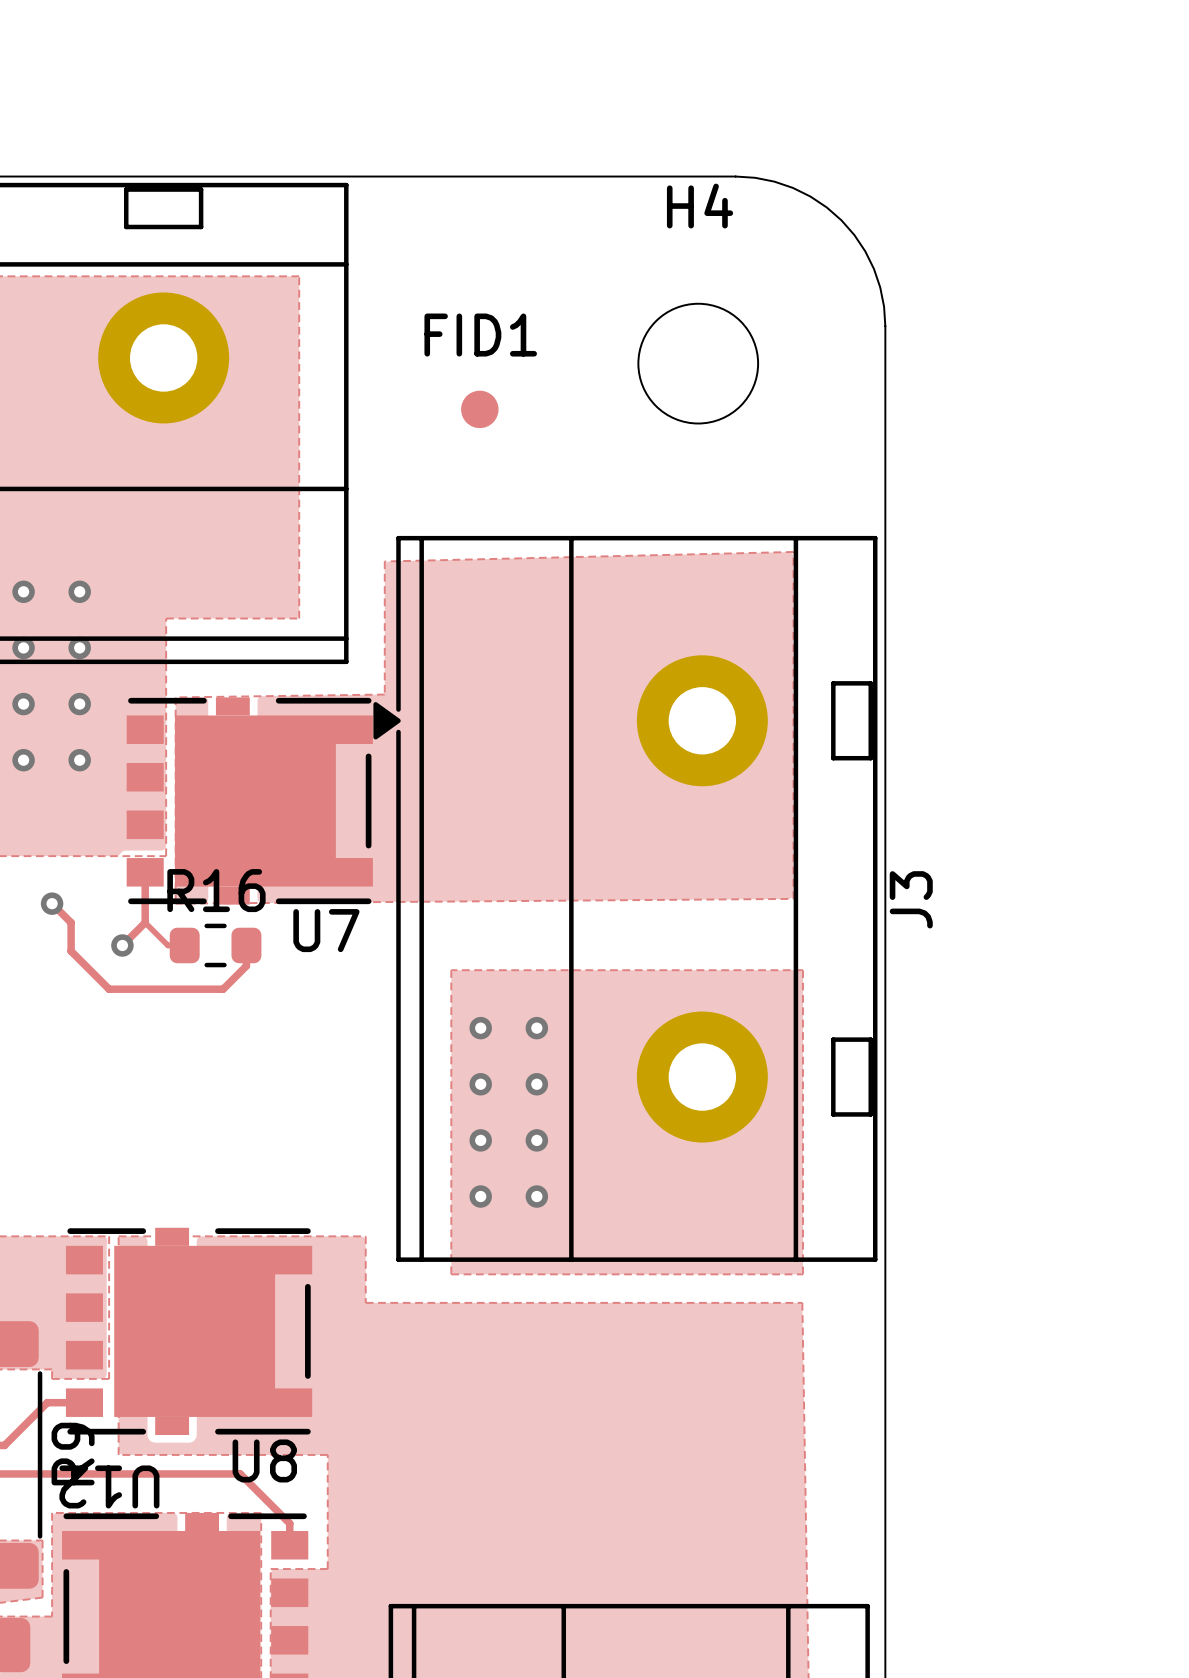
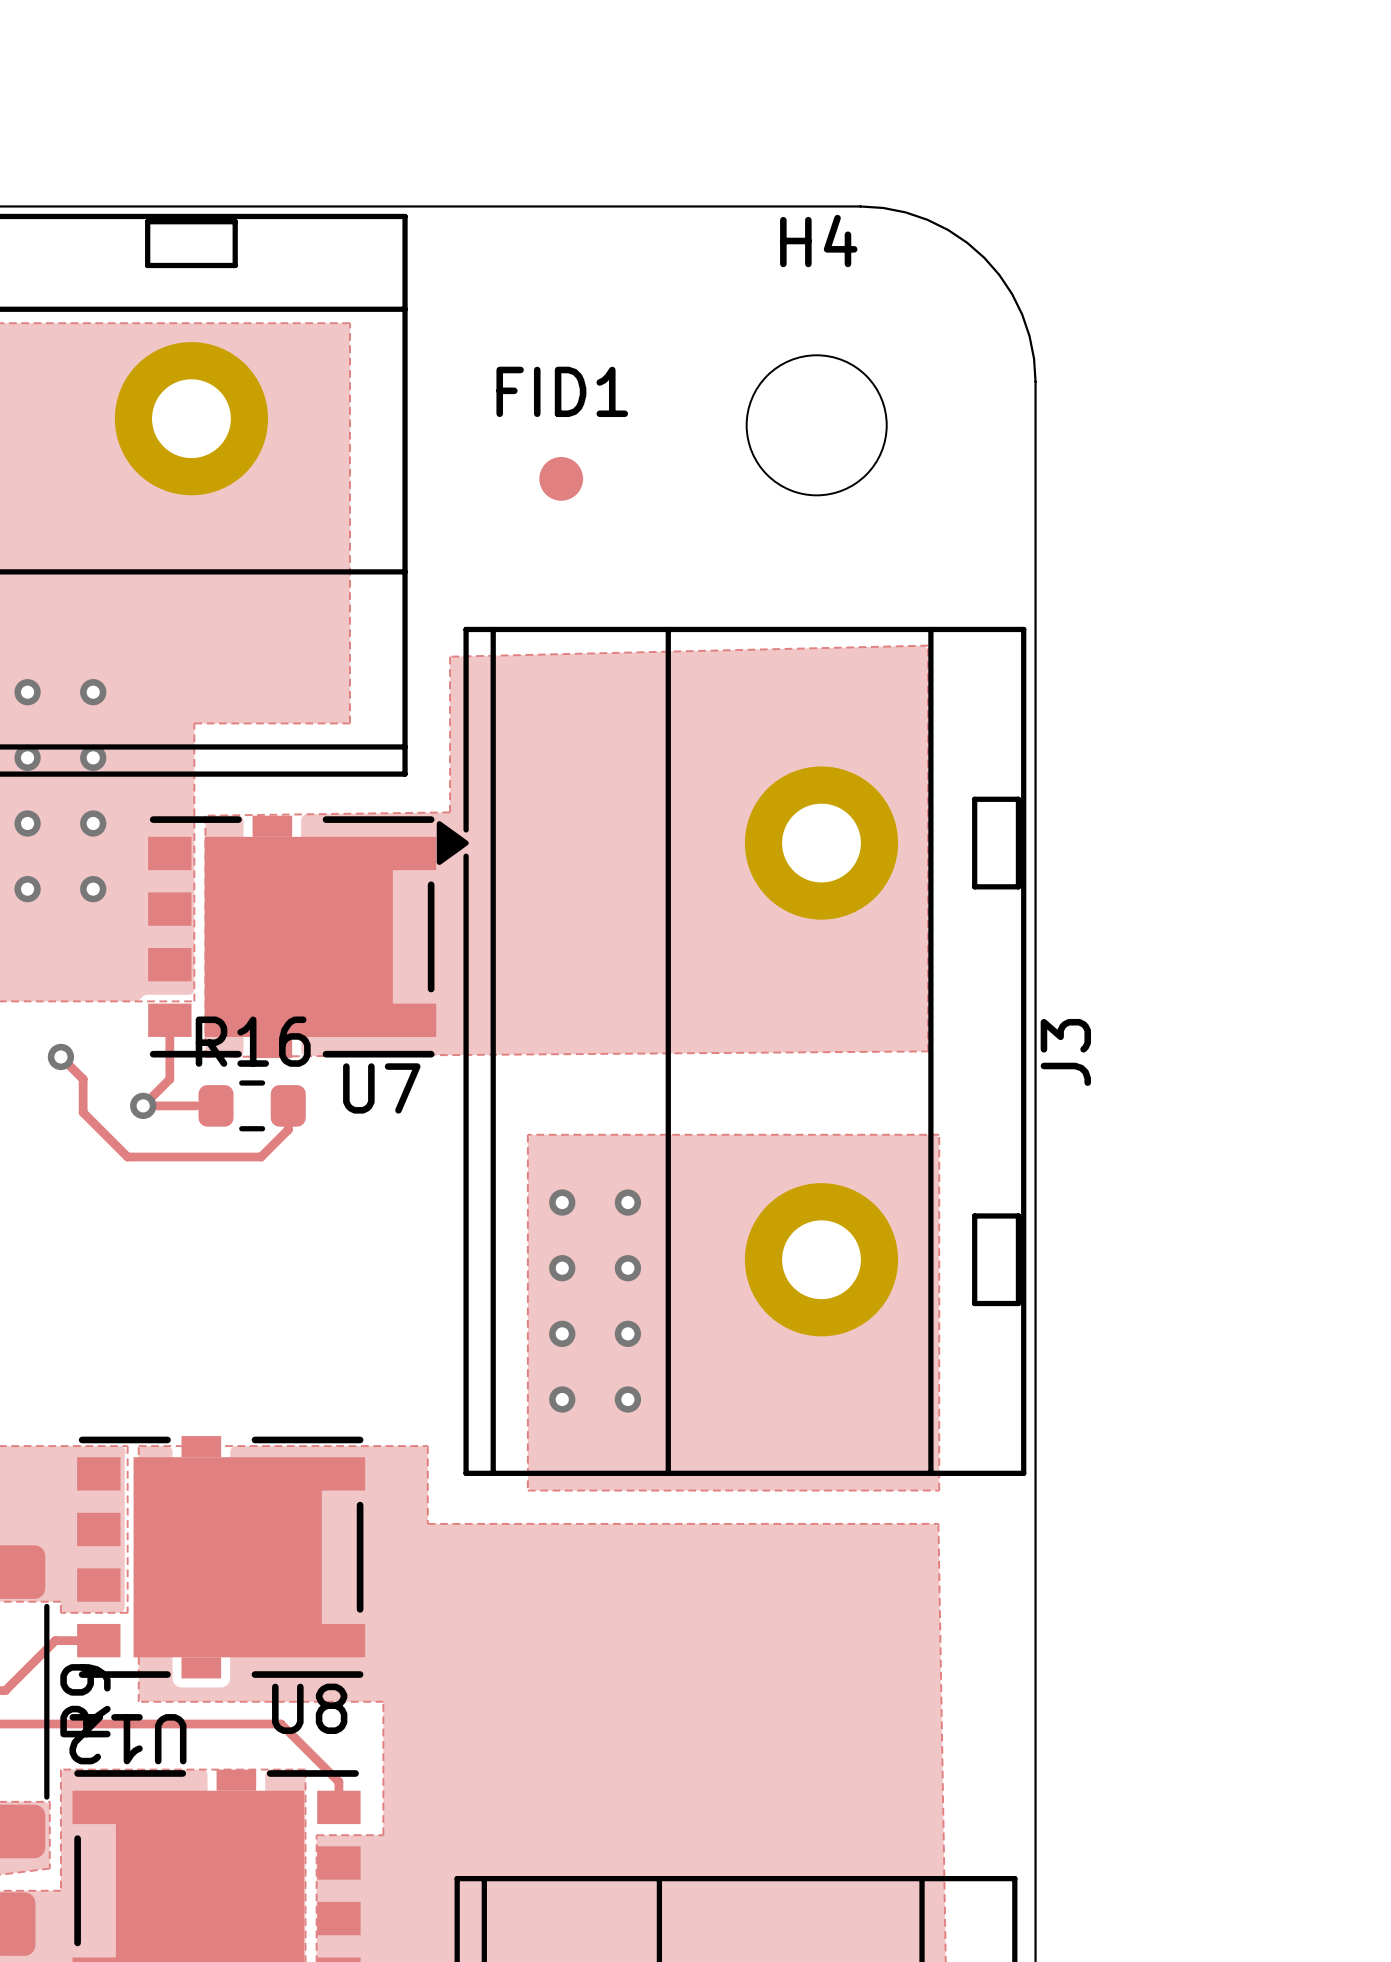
track: (145, 922) (167, 945) -> (143, 1105) (196, 1105)

